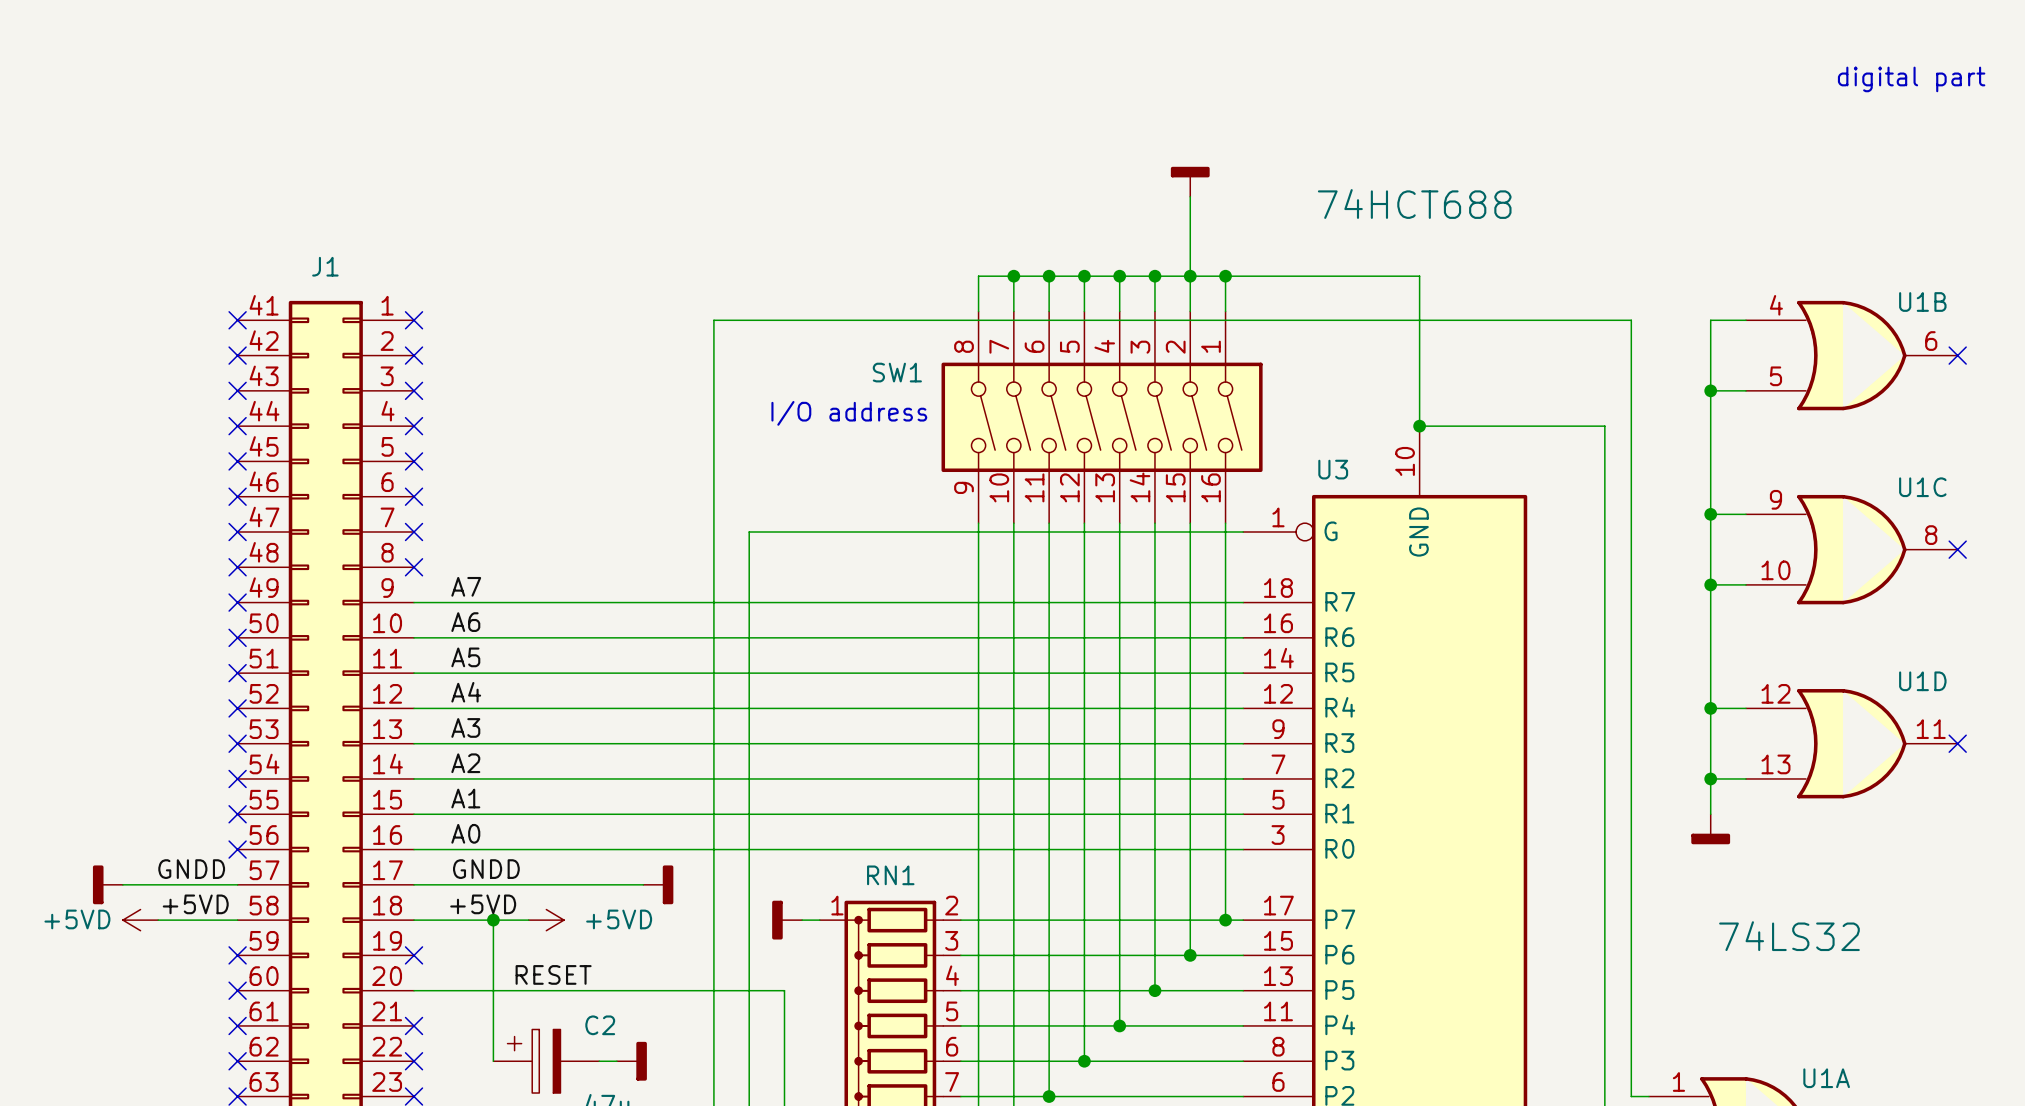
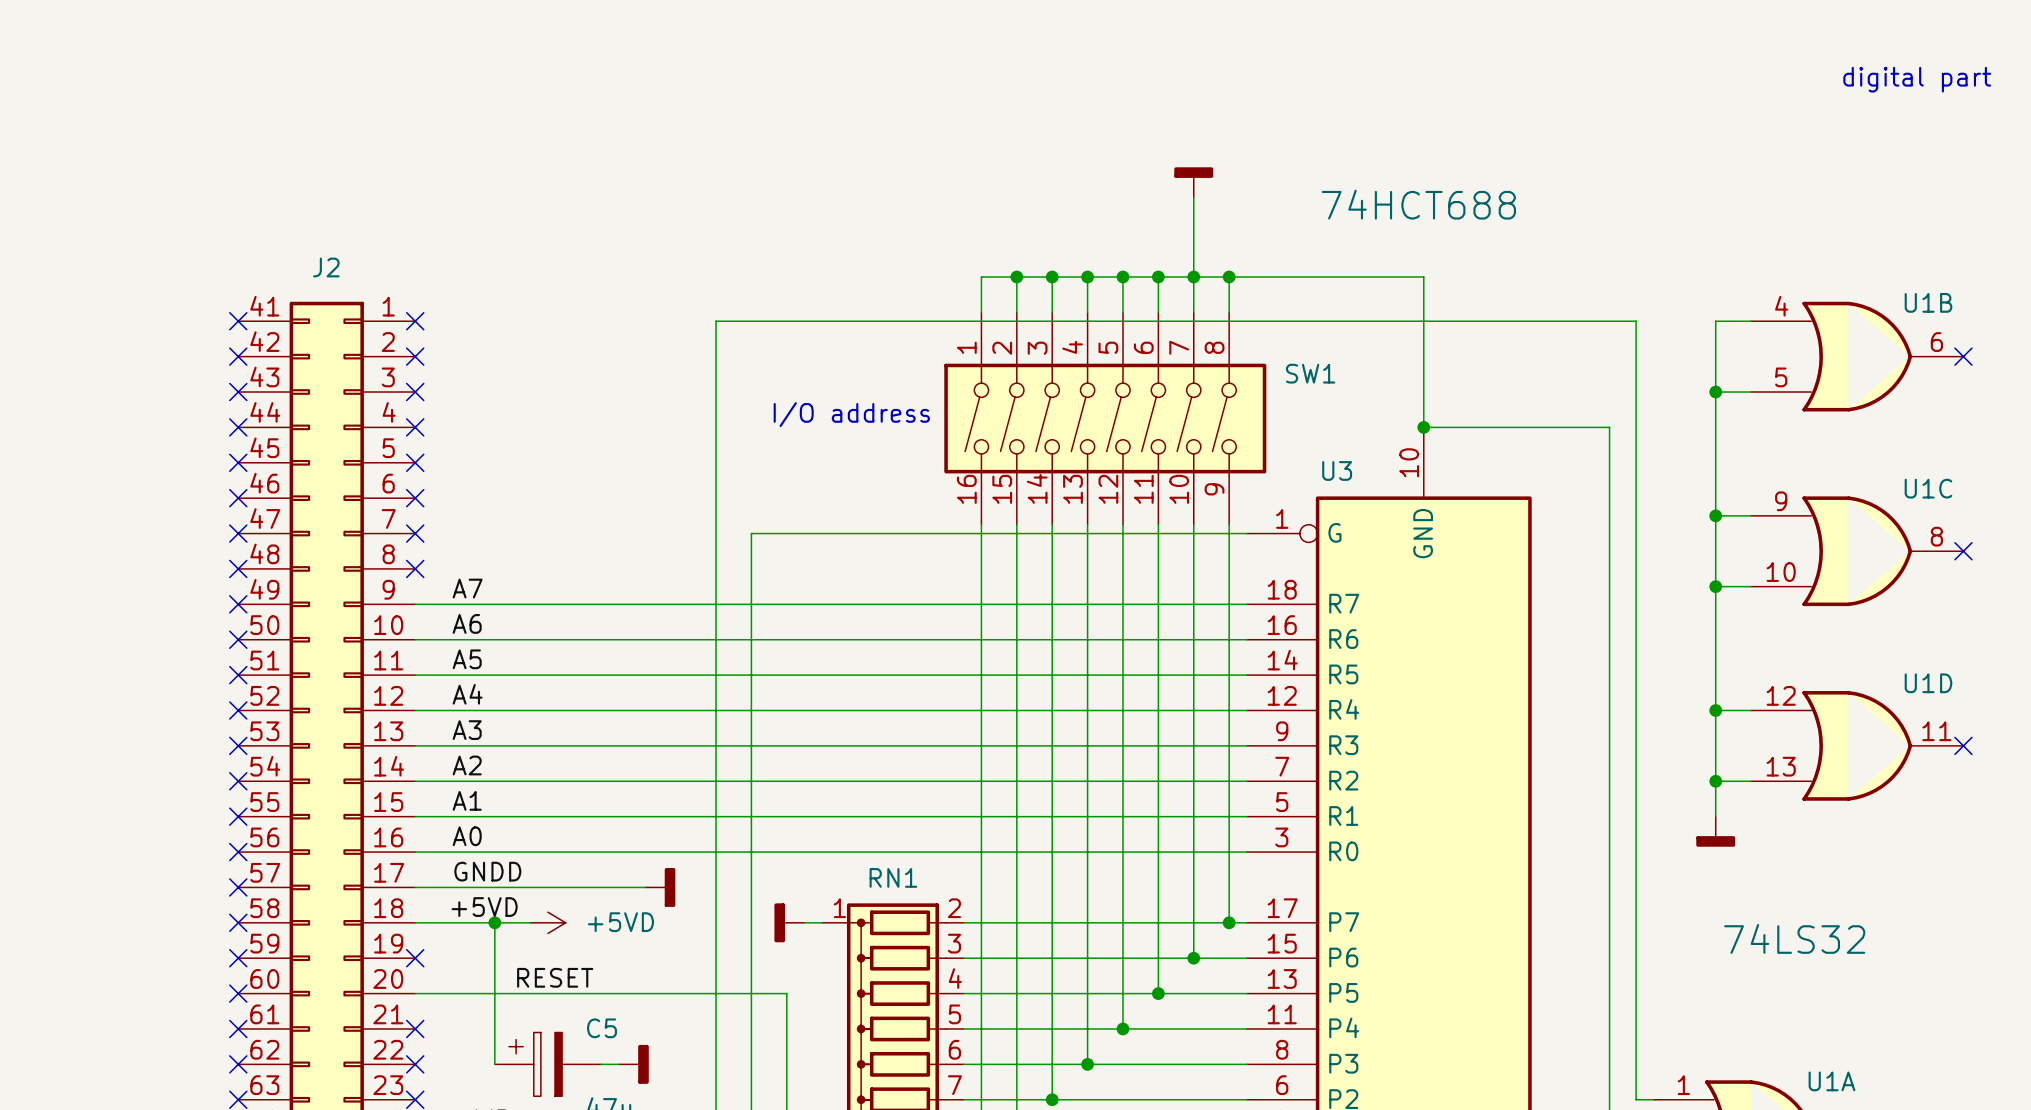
J1 name: J1 (325, 266) -> J2 (326, 267)
SW1 flip: as is (1102, 417) -> left-right (1105, 418)
label: GNDD (191, 869) -> none
power symbol: (107, 884) -> none
wire: (122, 884) (237, 884) -> none
no-connect mark: none -> (238, 887)
label: +5VD (195, 904) -> none
power symbol: +5VD (140, 920) -> none
wire: (158, 920) (237, 920) -> none
no-connect mark: none -> (238, 922)
C2 name: C2 (600, 1025) -> C5 (601, 1028)

